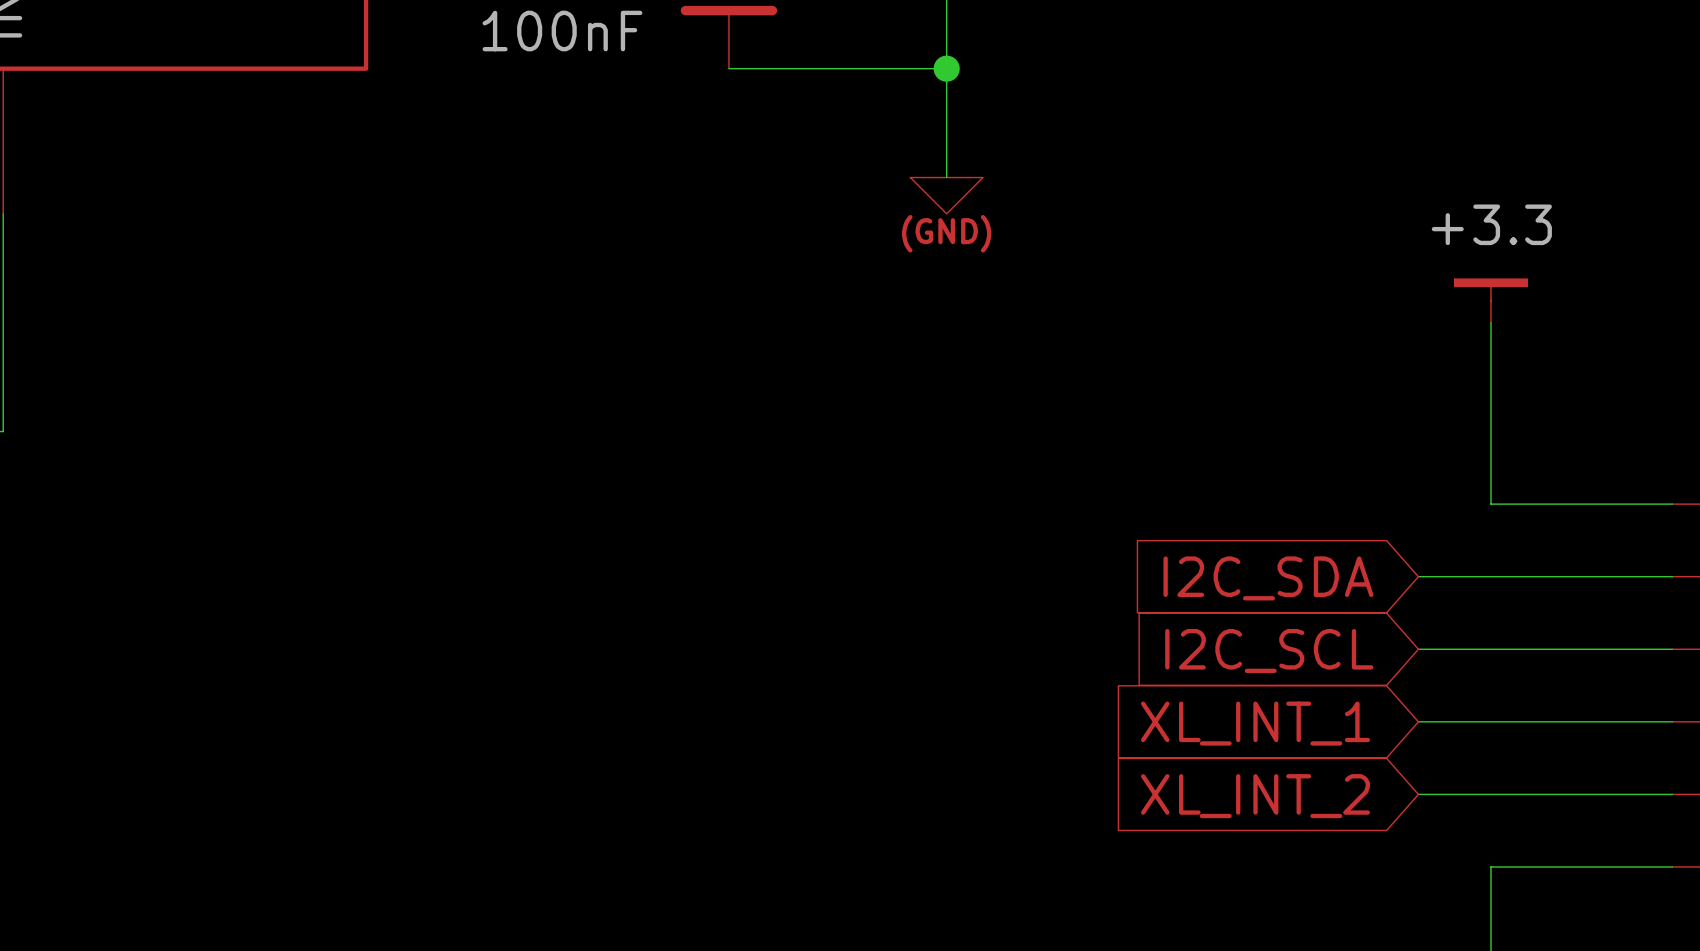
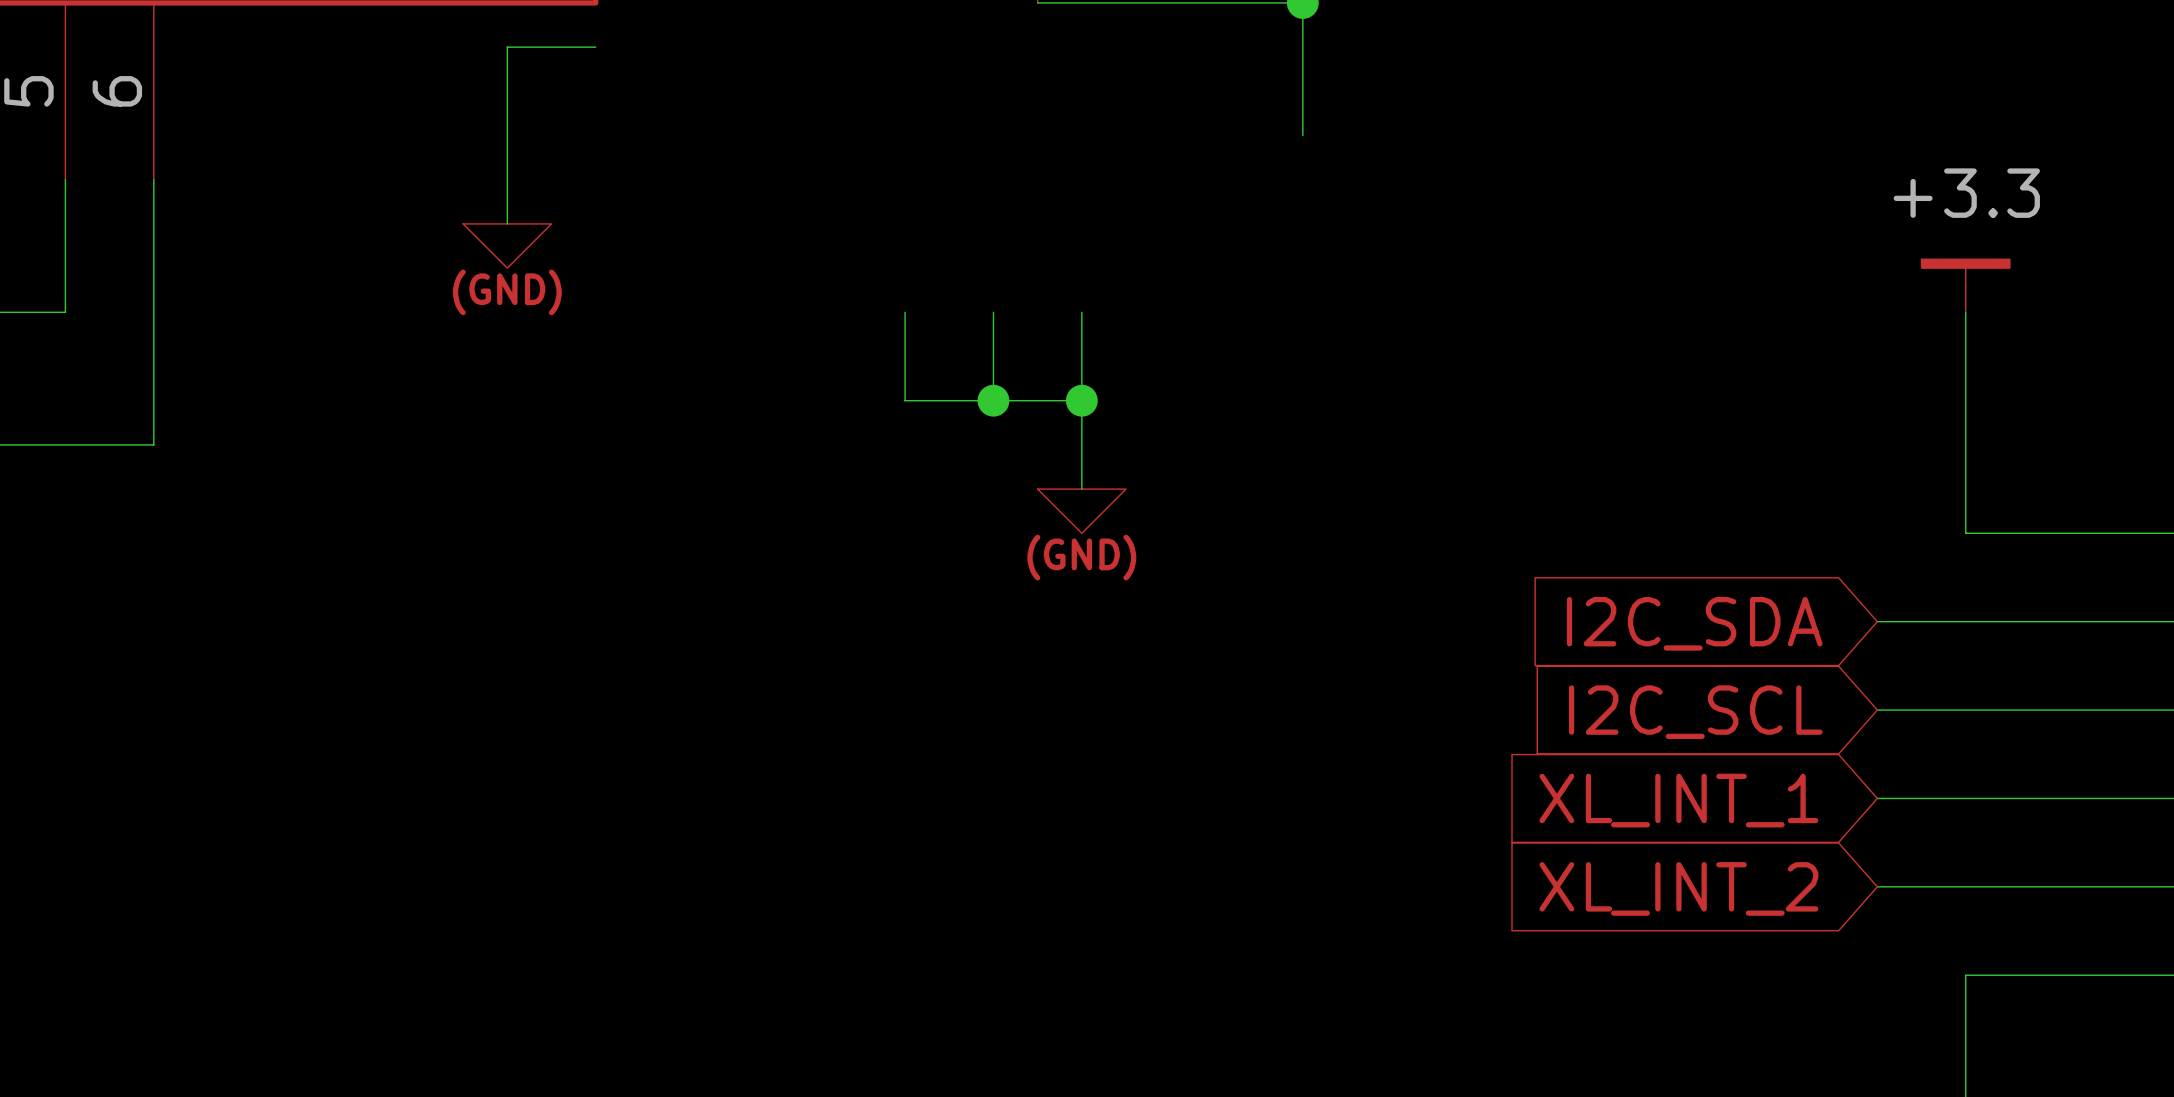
wire: none -> (595, 47) (507, 47) (507, 223)
power symbol: (946, 195) -> none
power symbol: none -> (507, 246)
wire: none -> (905, 312) (905, 400) (1081, 400)
wire: none -> (993, 312) (993, 400)
wire: none -> (1081, 312) (1081, 489)
junction: none -> (993, 400)
junction: none -> (1081, 400)
power symbol: none -> (1081, 511)

